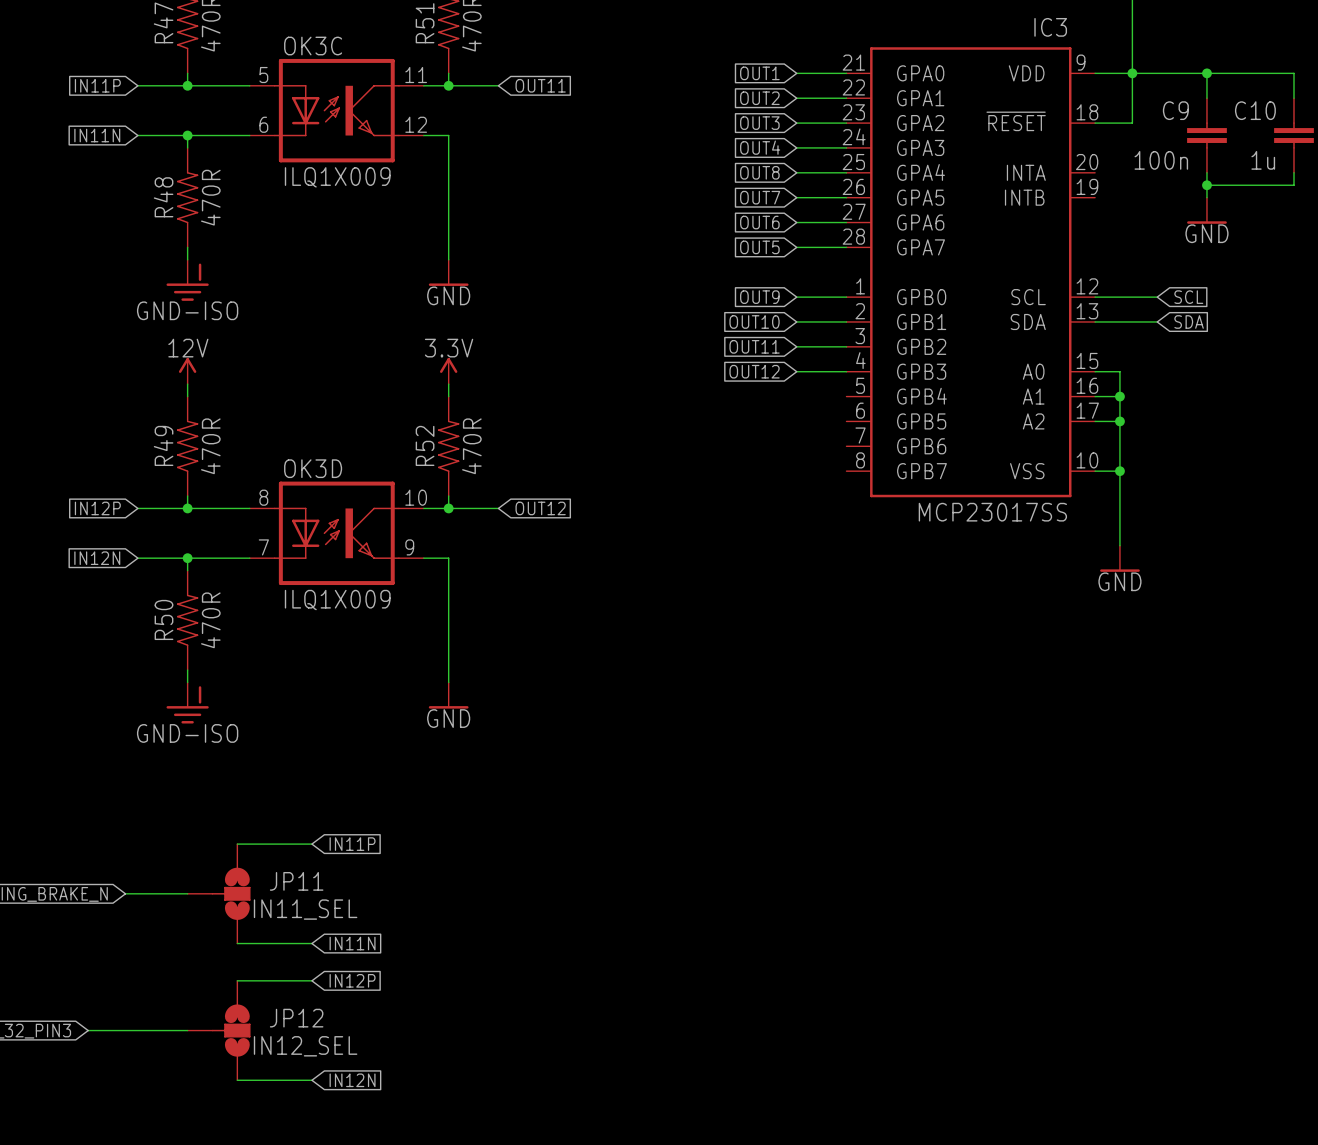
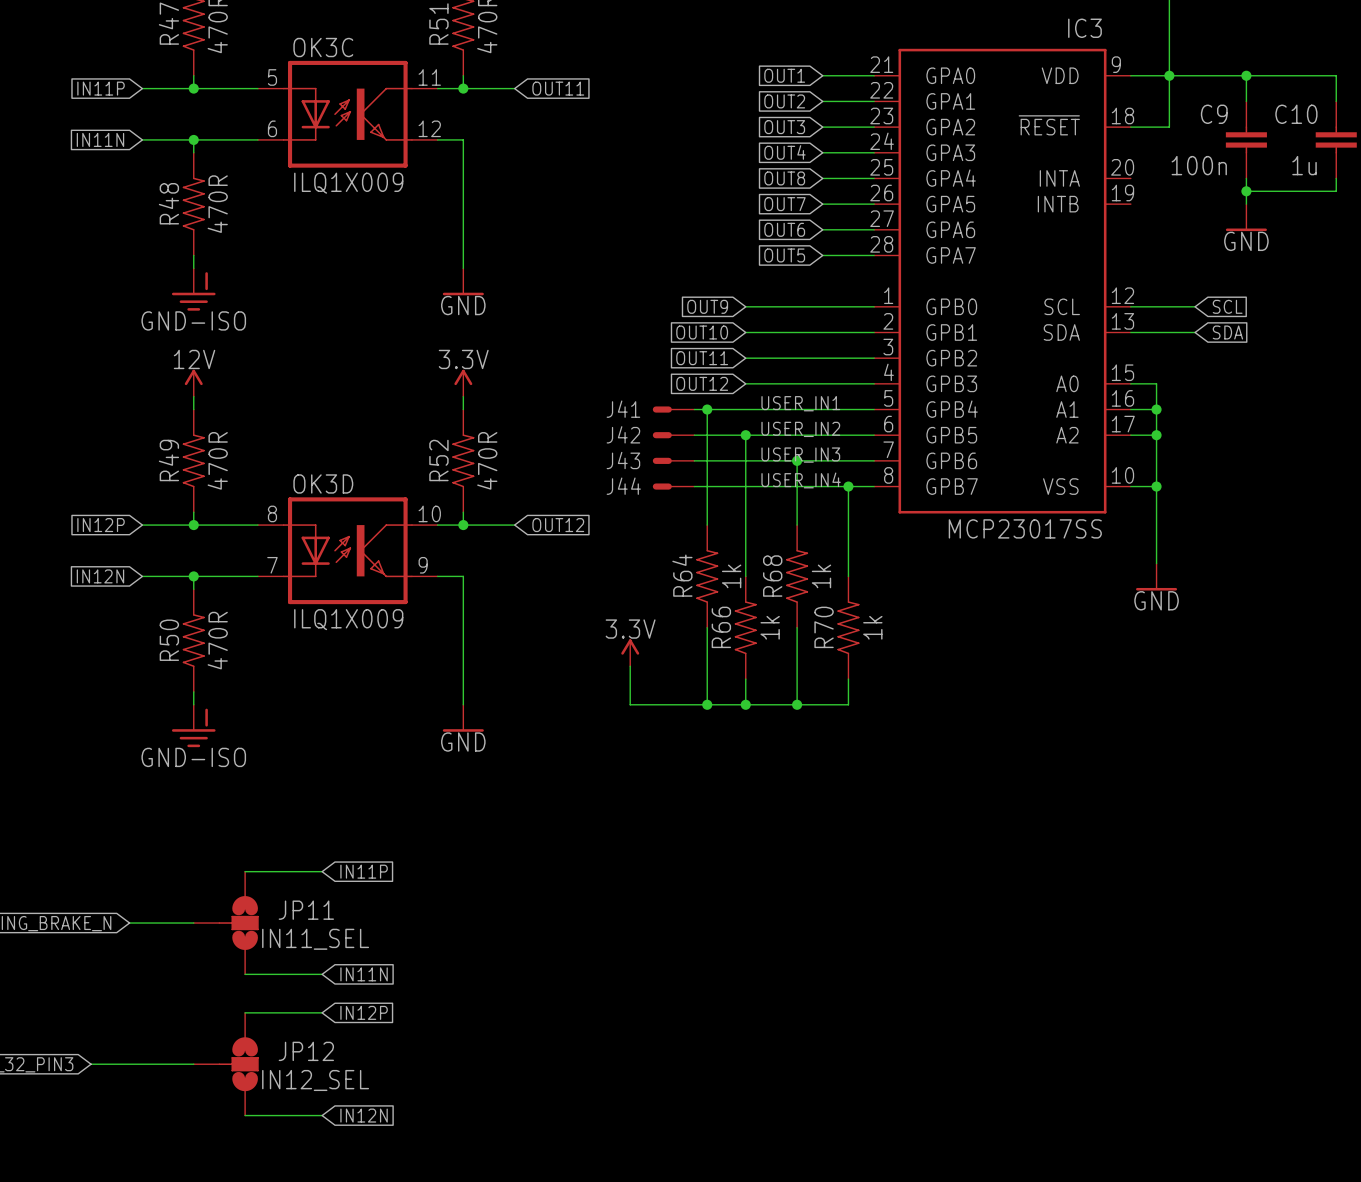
wire: none -> (745, 306) (822, 306)
global label position: OUT9 (759, 297) -> OUT9 (707, 306)
wire: none -> (745, 332) (822, 332)
global label position: OUT10 (754, 321) -> OUT10 (702, 332)
wire: none -> (745, 358) (822, 358)
global label position: OUT11 (754, 346) -> OUT11 (702, 358)
wire: none -> (745, 383) (822, 383)
global label position: OUT12 (754, 371) -> OUT12 (702, 383)
label: none -> USER_IN1 (800, 403)
J41: none -> (673, 409)
wire: none -> (694, 409) (874, 409)
wire: none -> (707, 409) (707, 525)
junction: none -> (707, 409)
label: none -> USER_IN2 (800, 429)
J42: none -> (673, 435)
wire: none -> (694, 435) (874, 435)
wire: none -> (745, 435) (745, 576)
junction: none -> (745, 435)
label: none -> USER_IN3 (800, 455)
J43: none -> (673, 460)
wire: none -> (694, 460) (874, 460)
wire: none -> (797, 460) (797, 525)
junction: none -> (797, 460)
label: none -> USER_IN4 (801, 480)
J44: none -> (673, 486)
wire: none -> (694, 486) (874, 486)
wire: none -> (848, 486) (848, 576)
junction: none -> (848, 486)
R64: none -> 1k (707, 576)
R68: none -> 1k (797, 576)
wire: none -> (707, 627) (707, 704)
R66: none -> 1k (745, 627)
wire: none -> (797, 627) (797, 704)
R70: none -> 1k (848, 627)
power symbol: none -> 3.3V (630, 652)
wire: none -> (630, 666) (630, 704) (848, 704) (848, 679)
wire: none -> (745, 679) (745, 704)
junction: none -> (707, 704)
junction: none -> (745, 704)
junction: none -> (797, 704)

